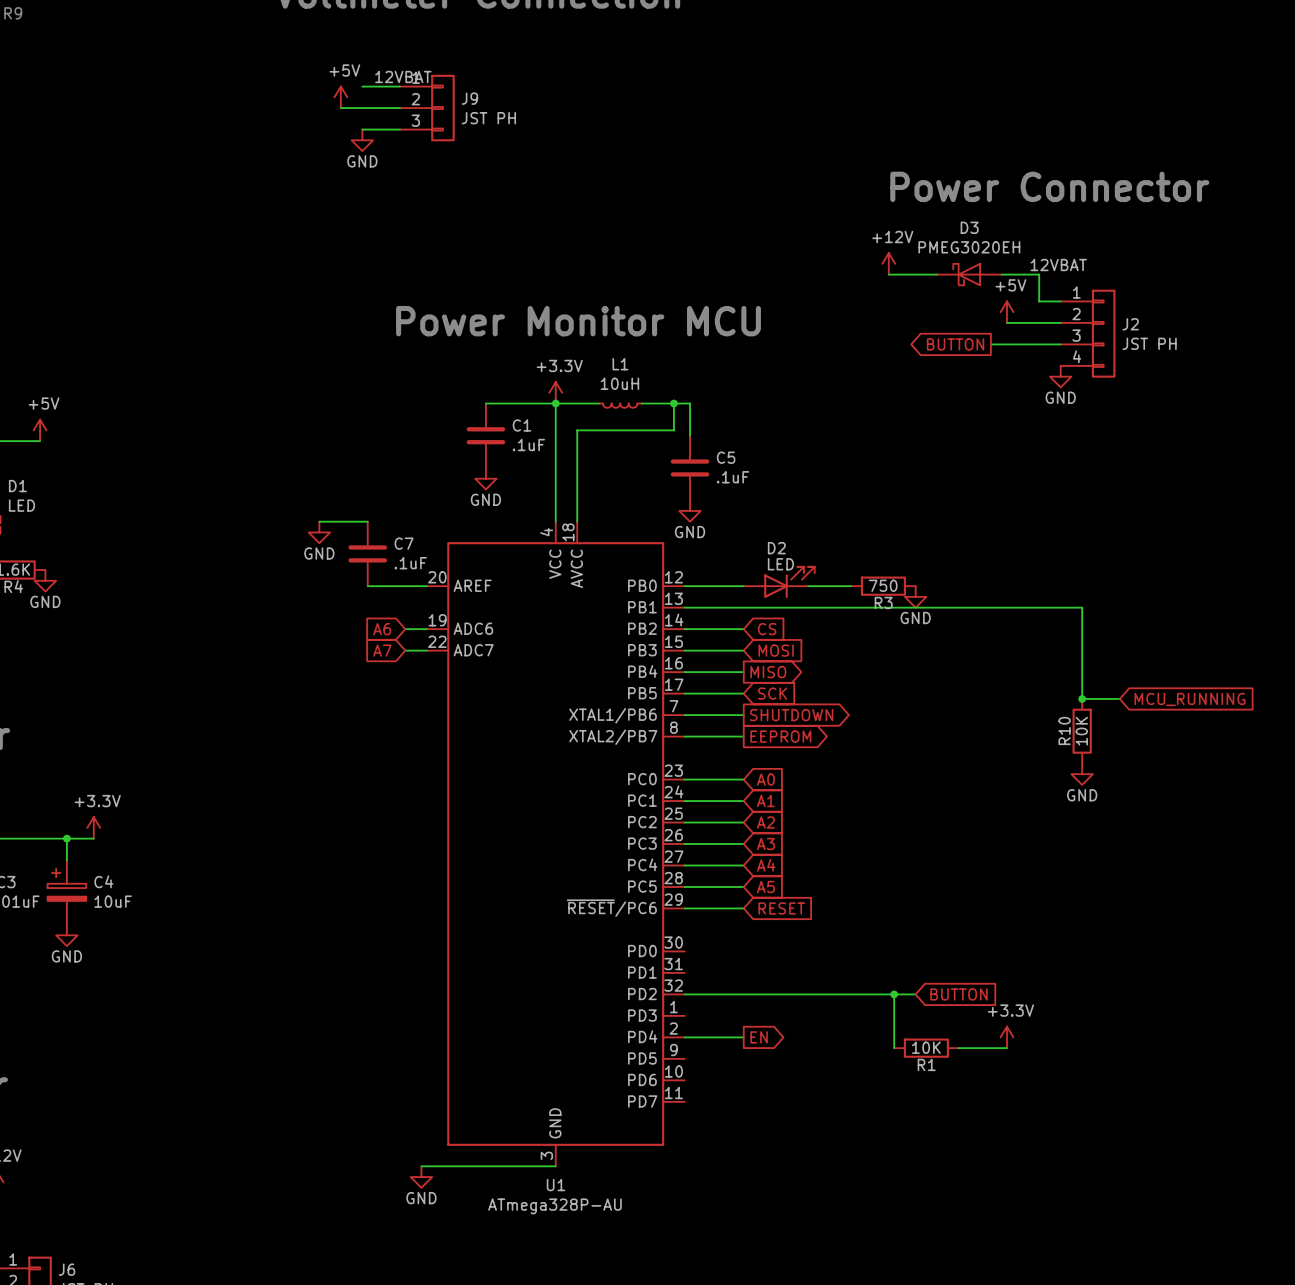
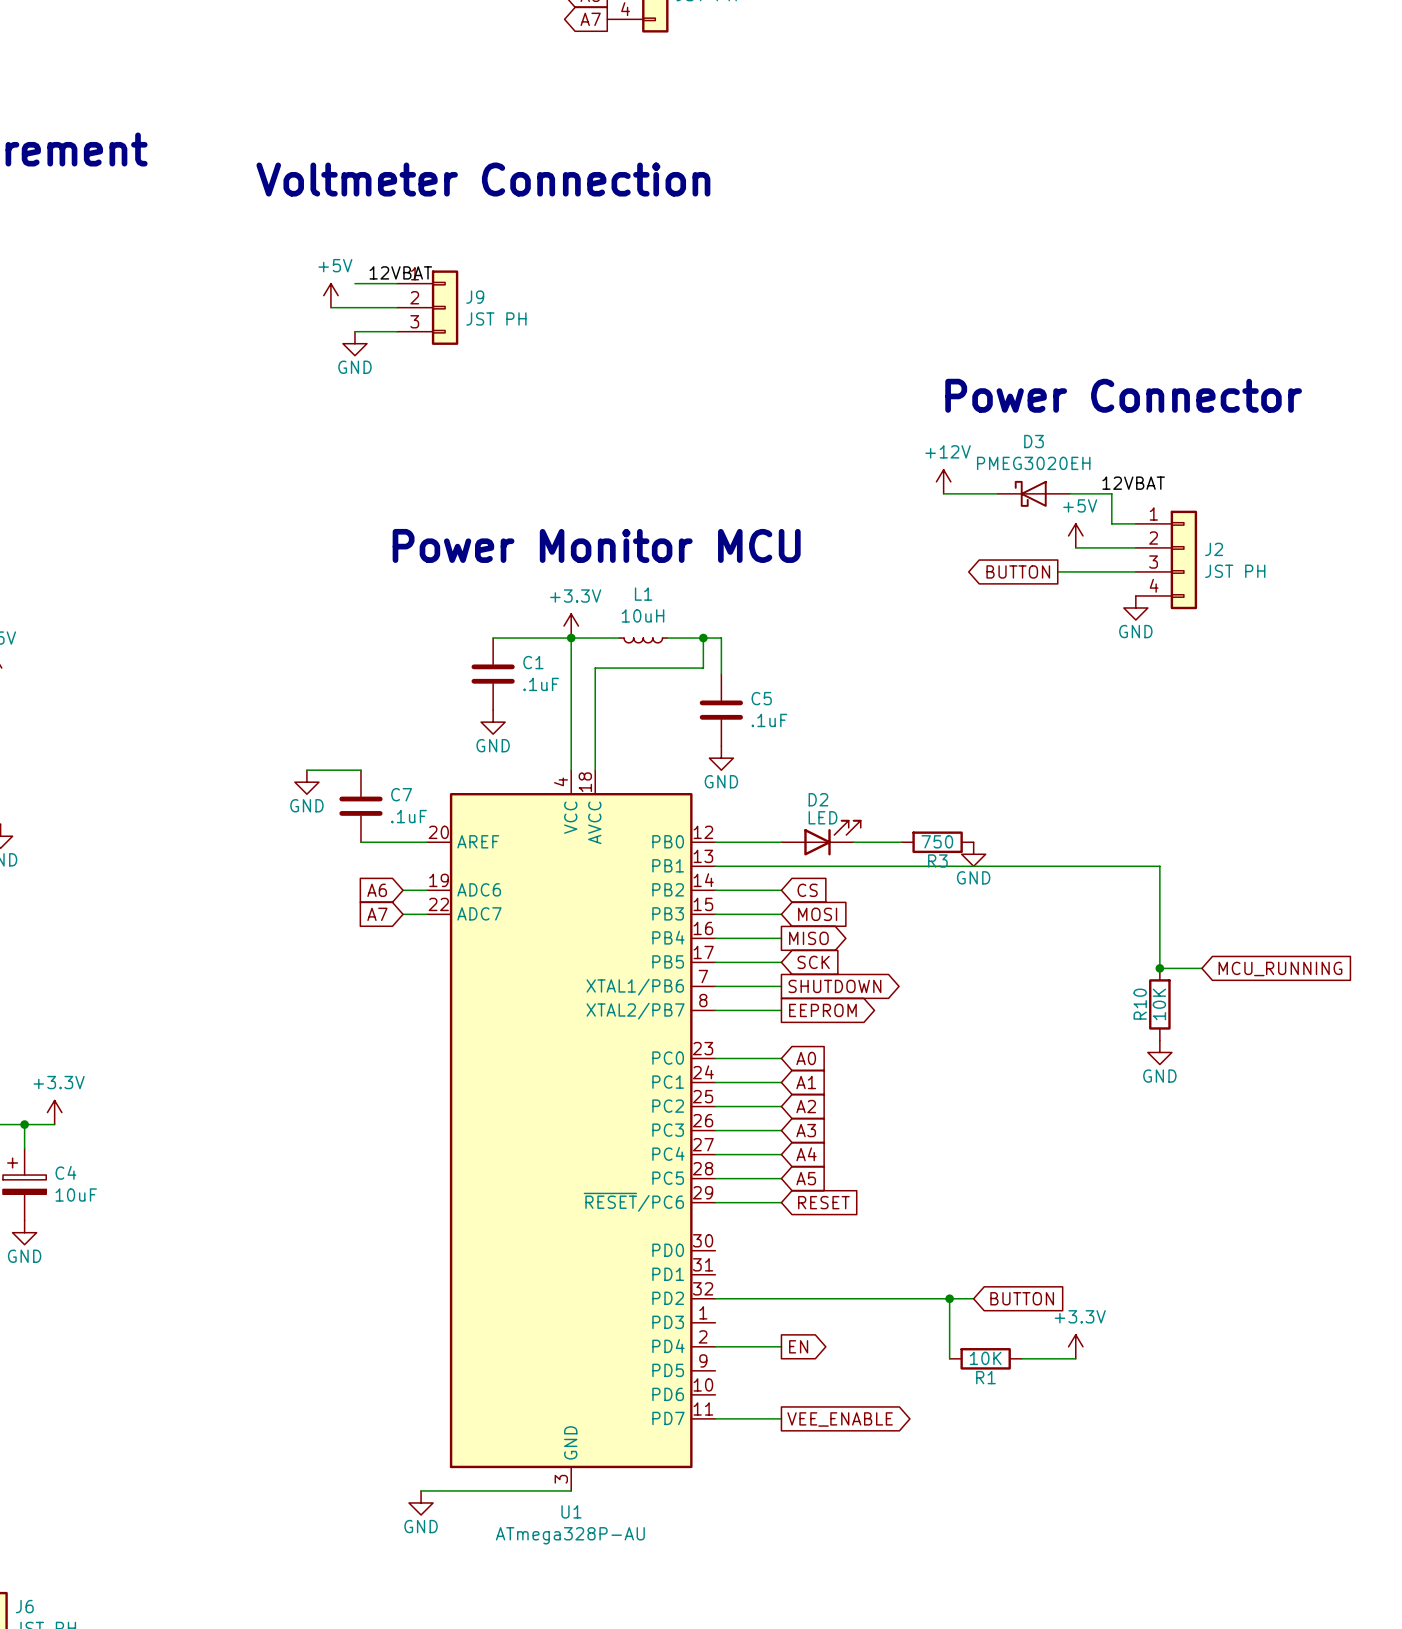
wire: none -> (715, 1418) (781, 1418)
global label: none -> VEE_ENABLE (840, 1419)

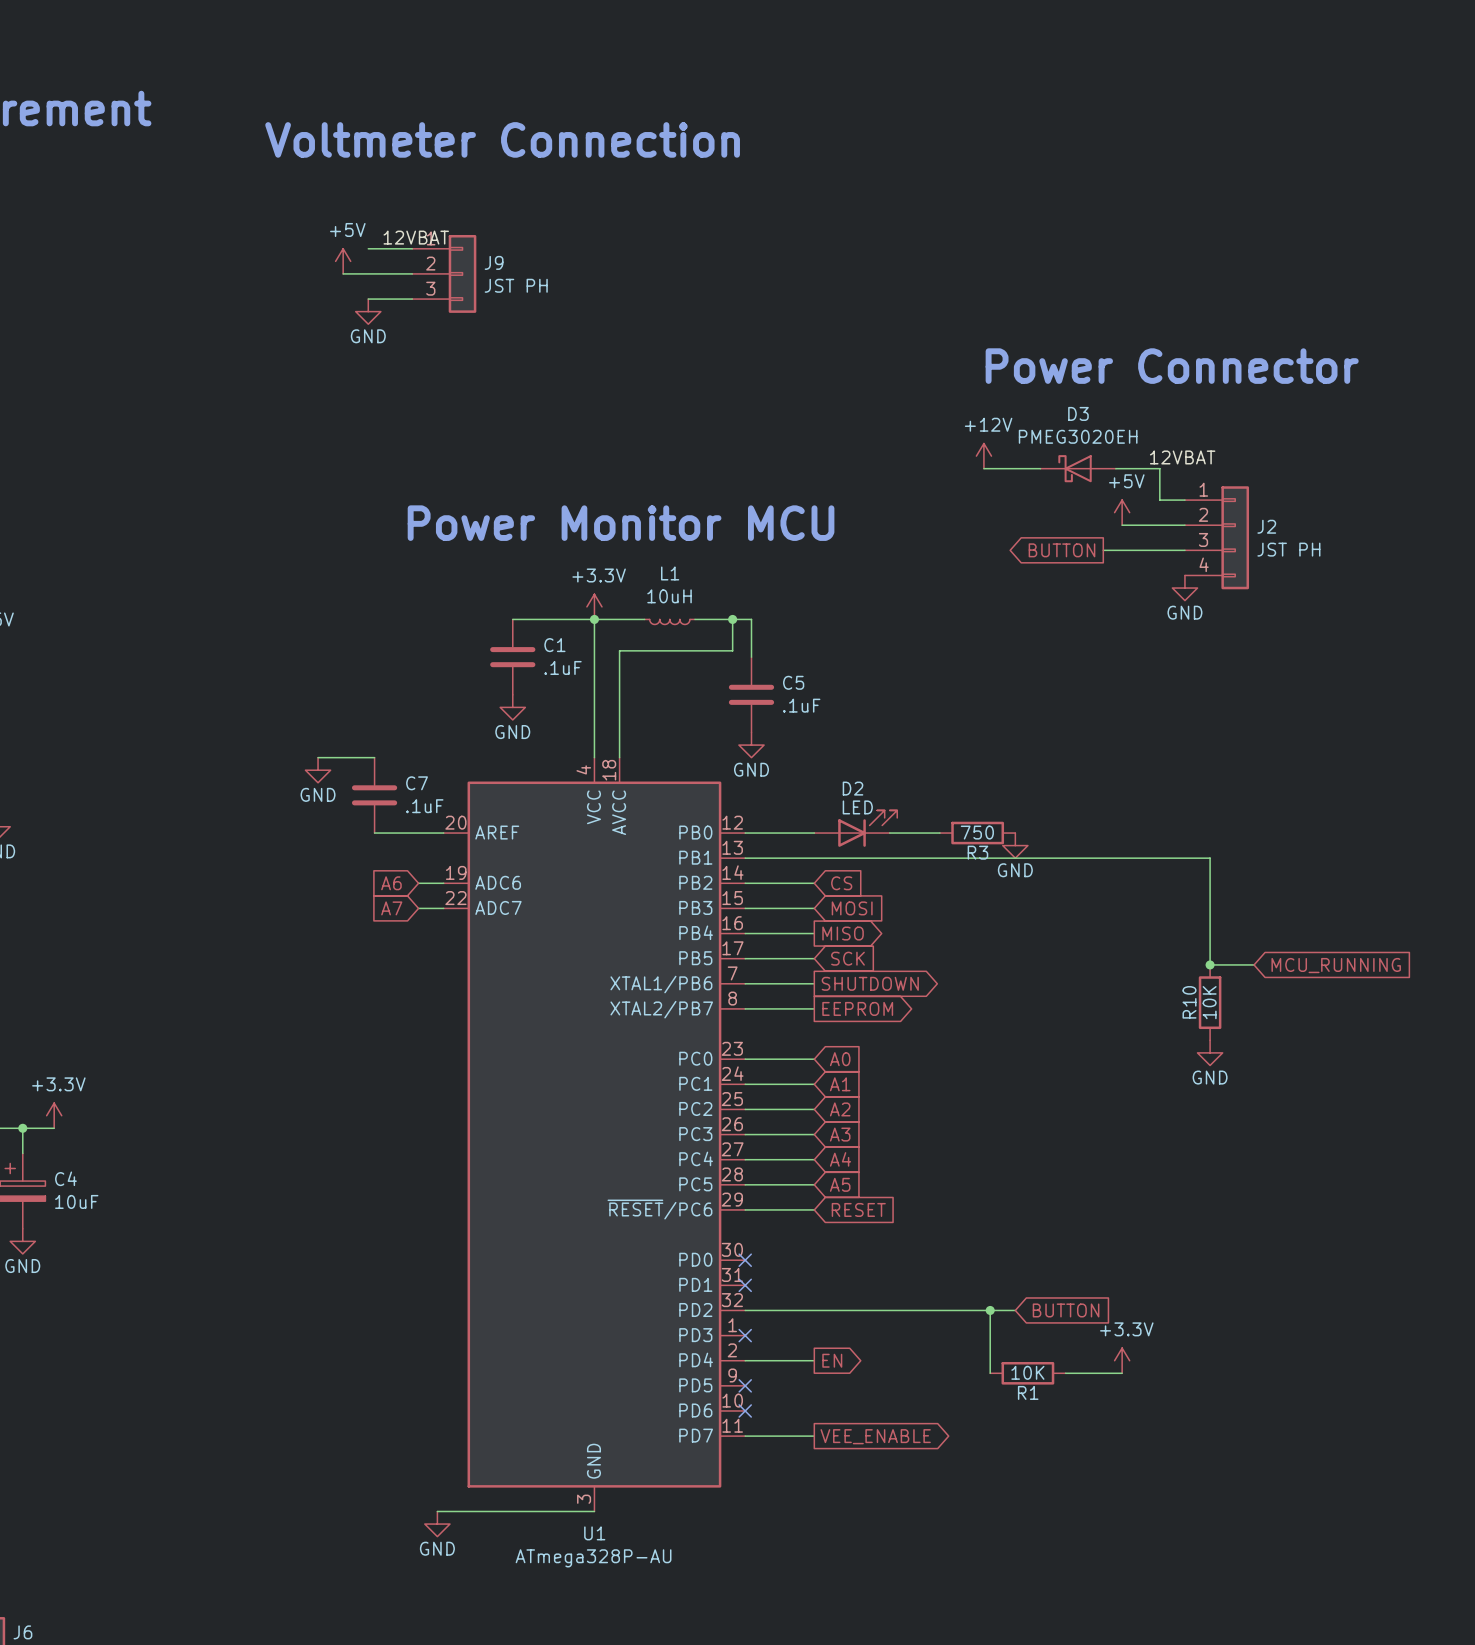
no-connect mark: none -> (745, 1260)
no-connect mark: none -> (745, 1285)
no-connect mark: none -> (745, 1335)
no-connect mark: none -> (745, 1385)
no-connect mark: none -> (745, 1410)

